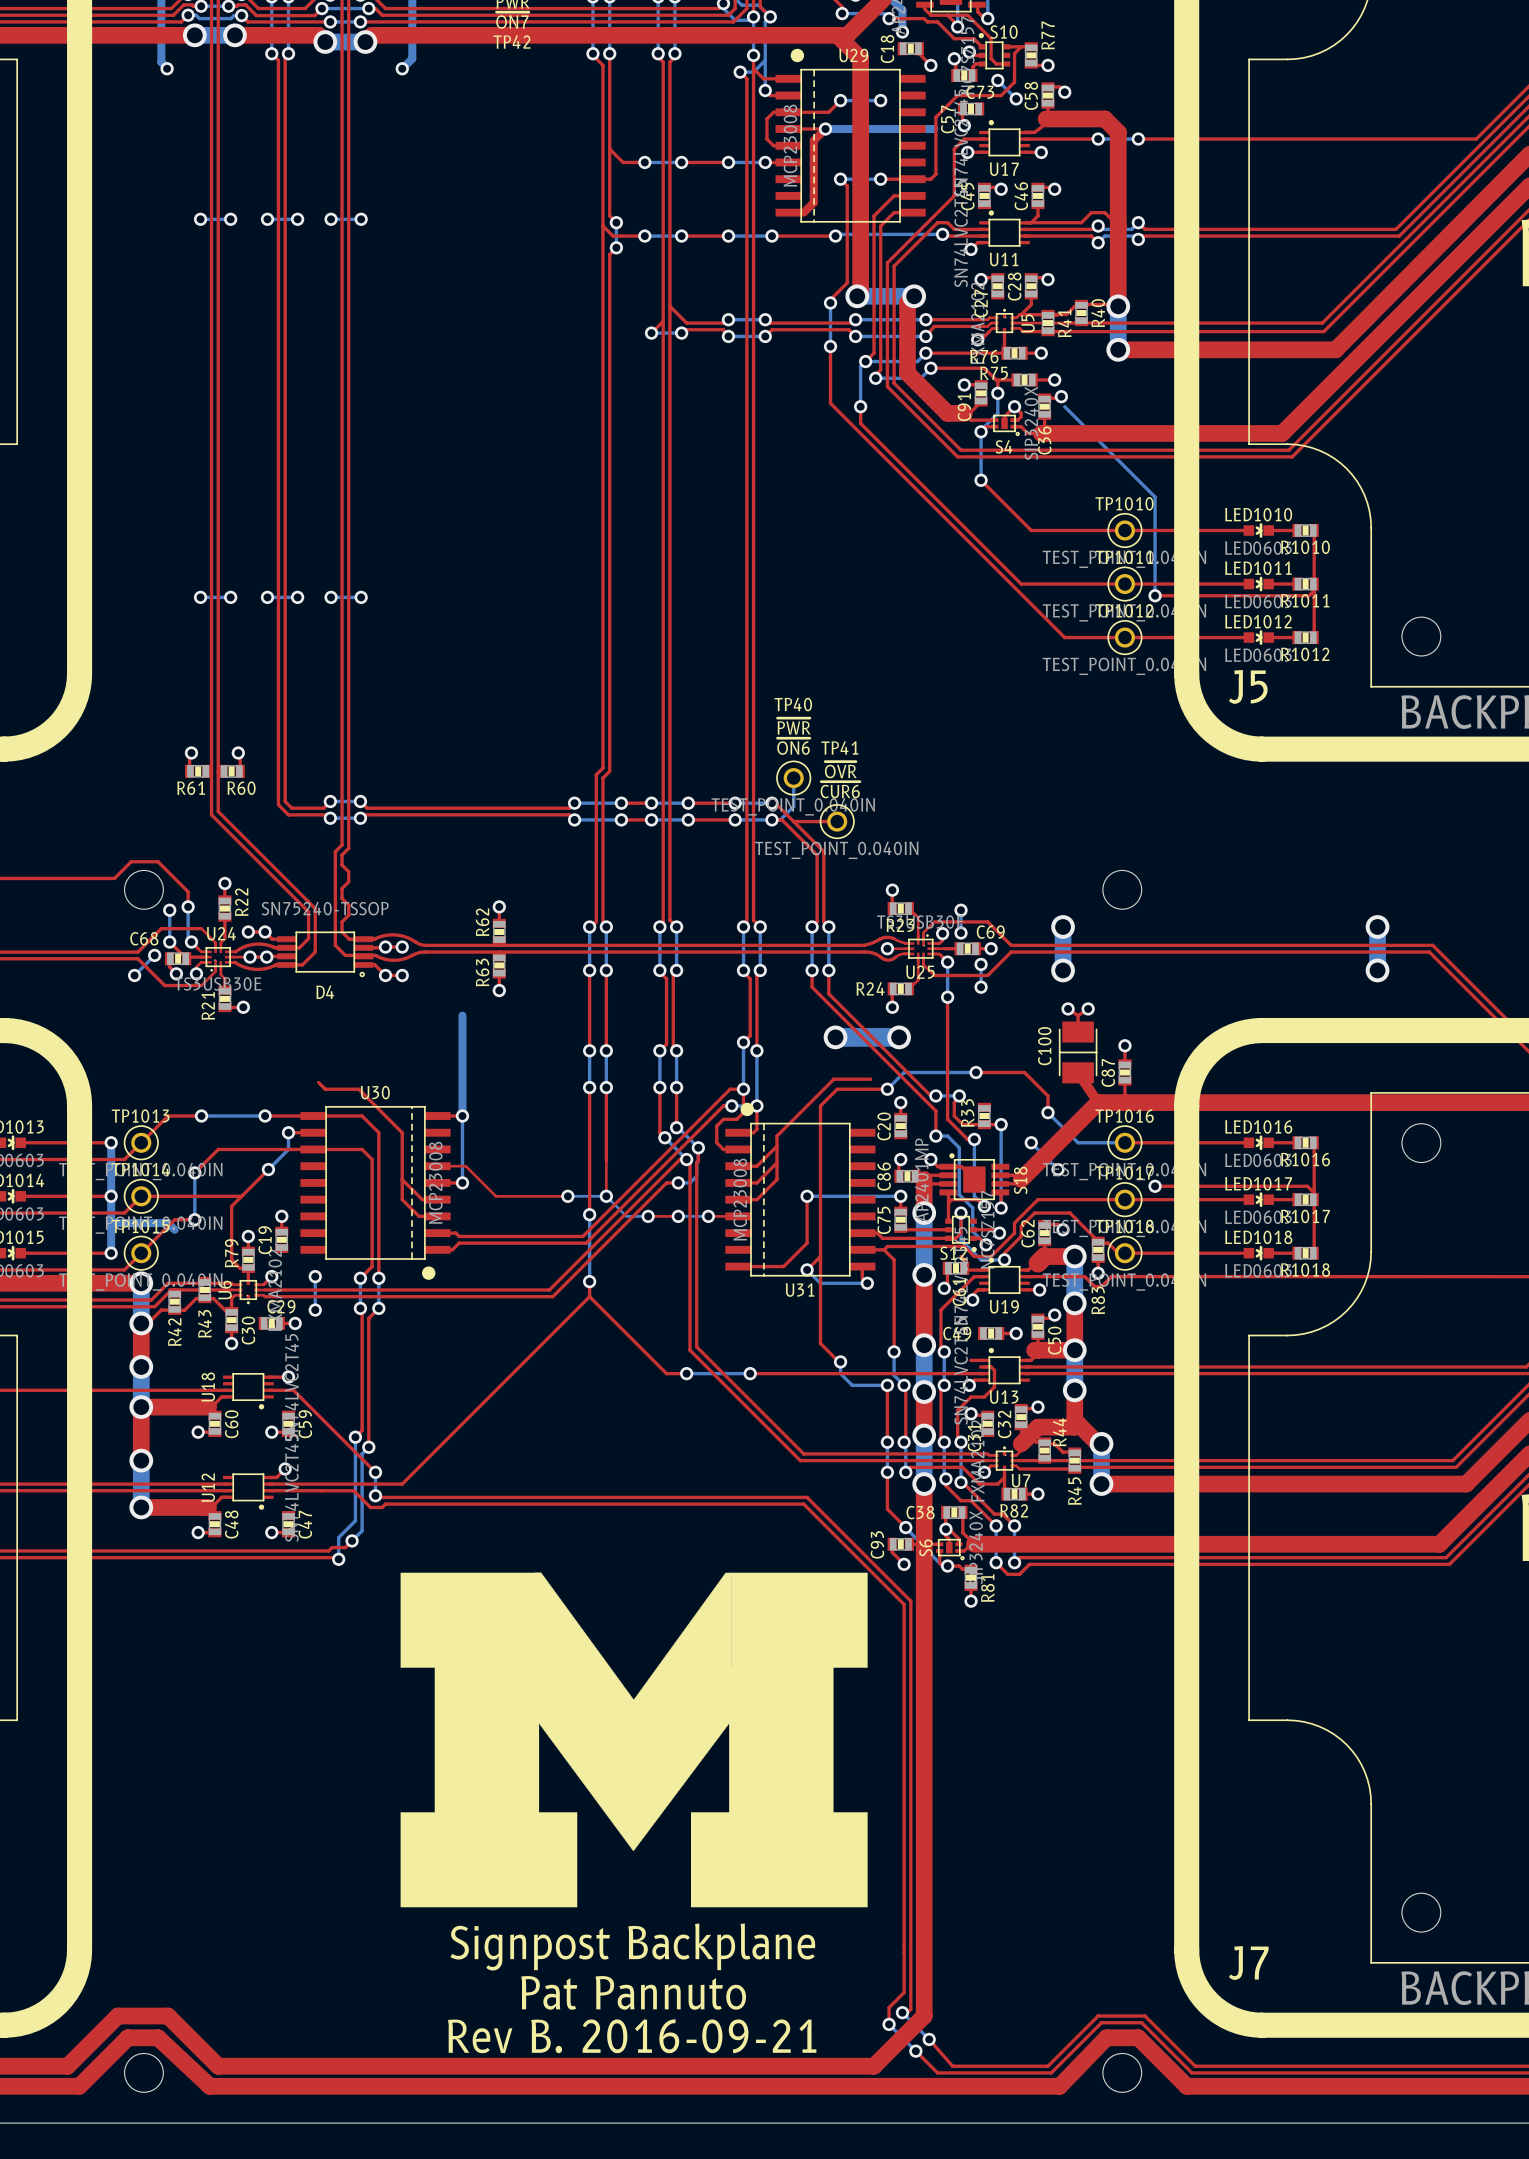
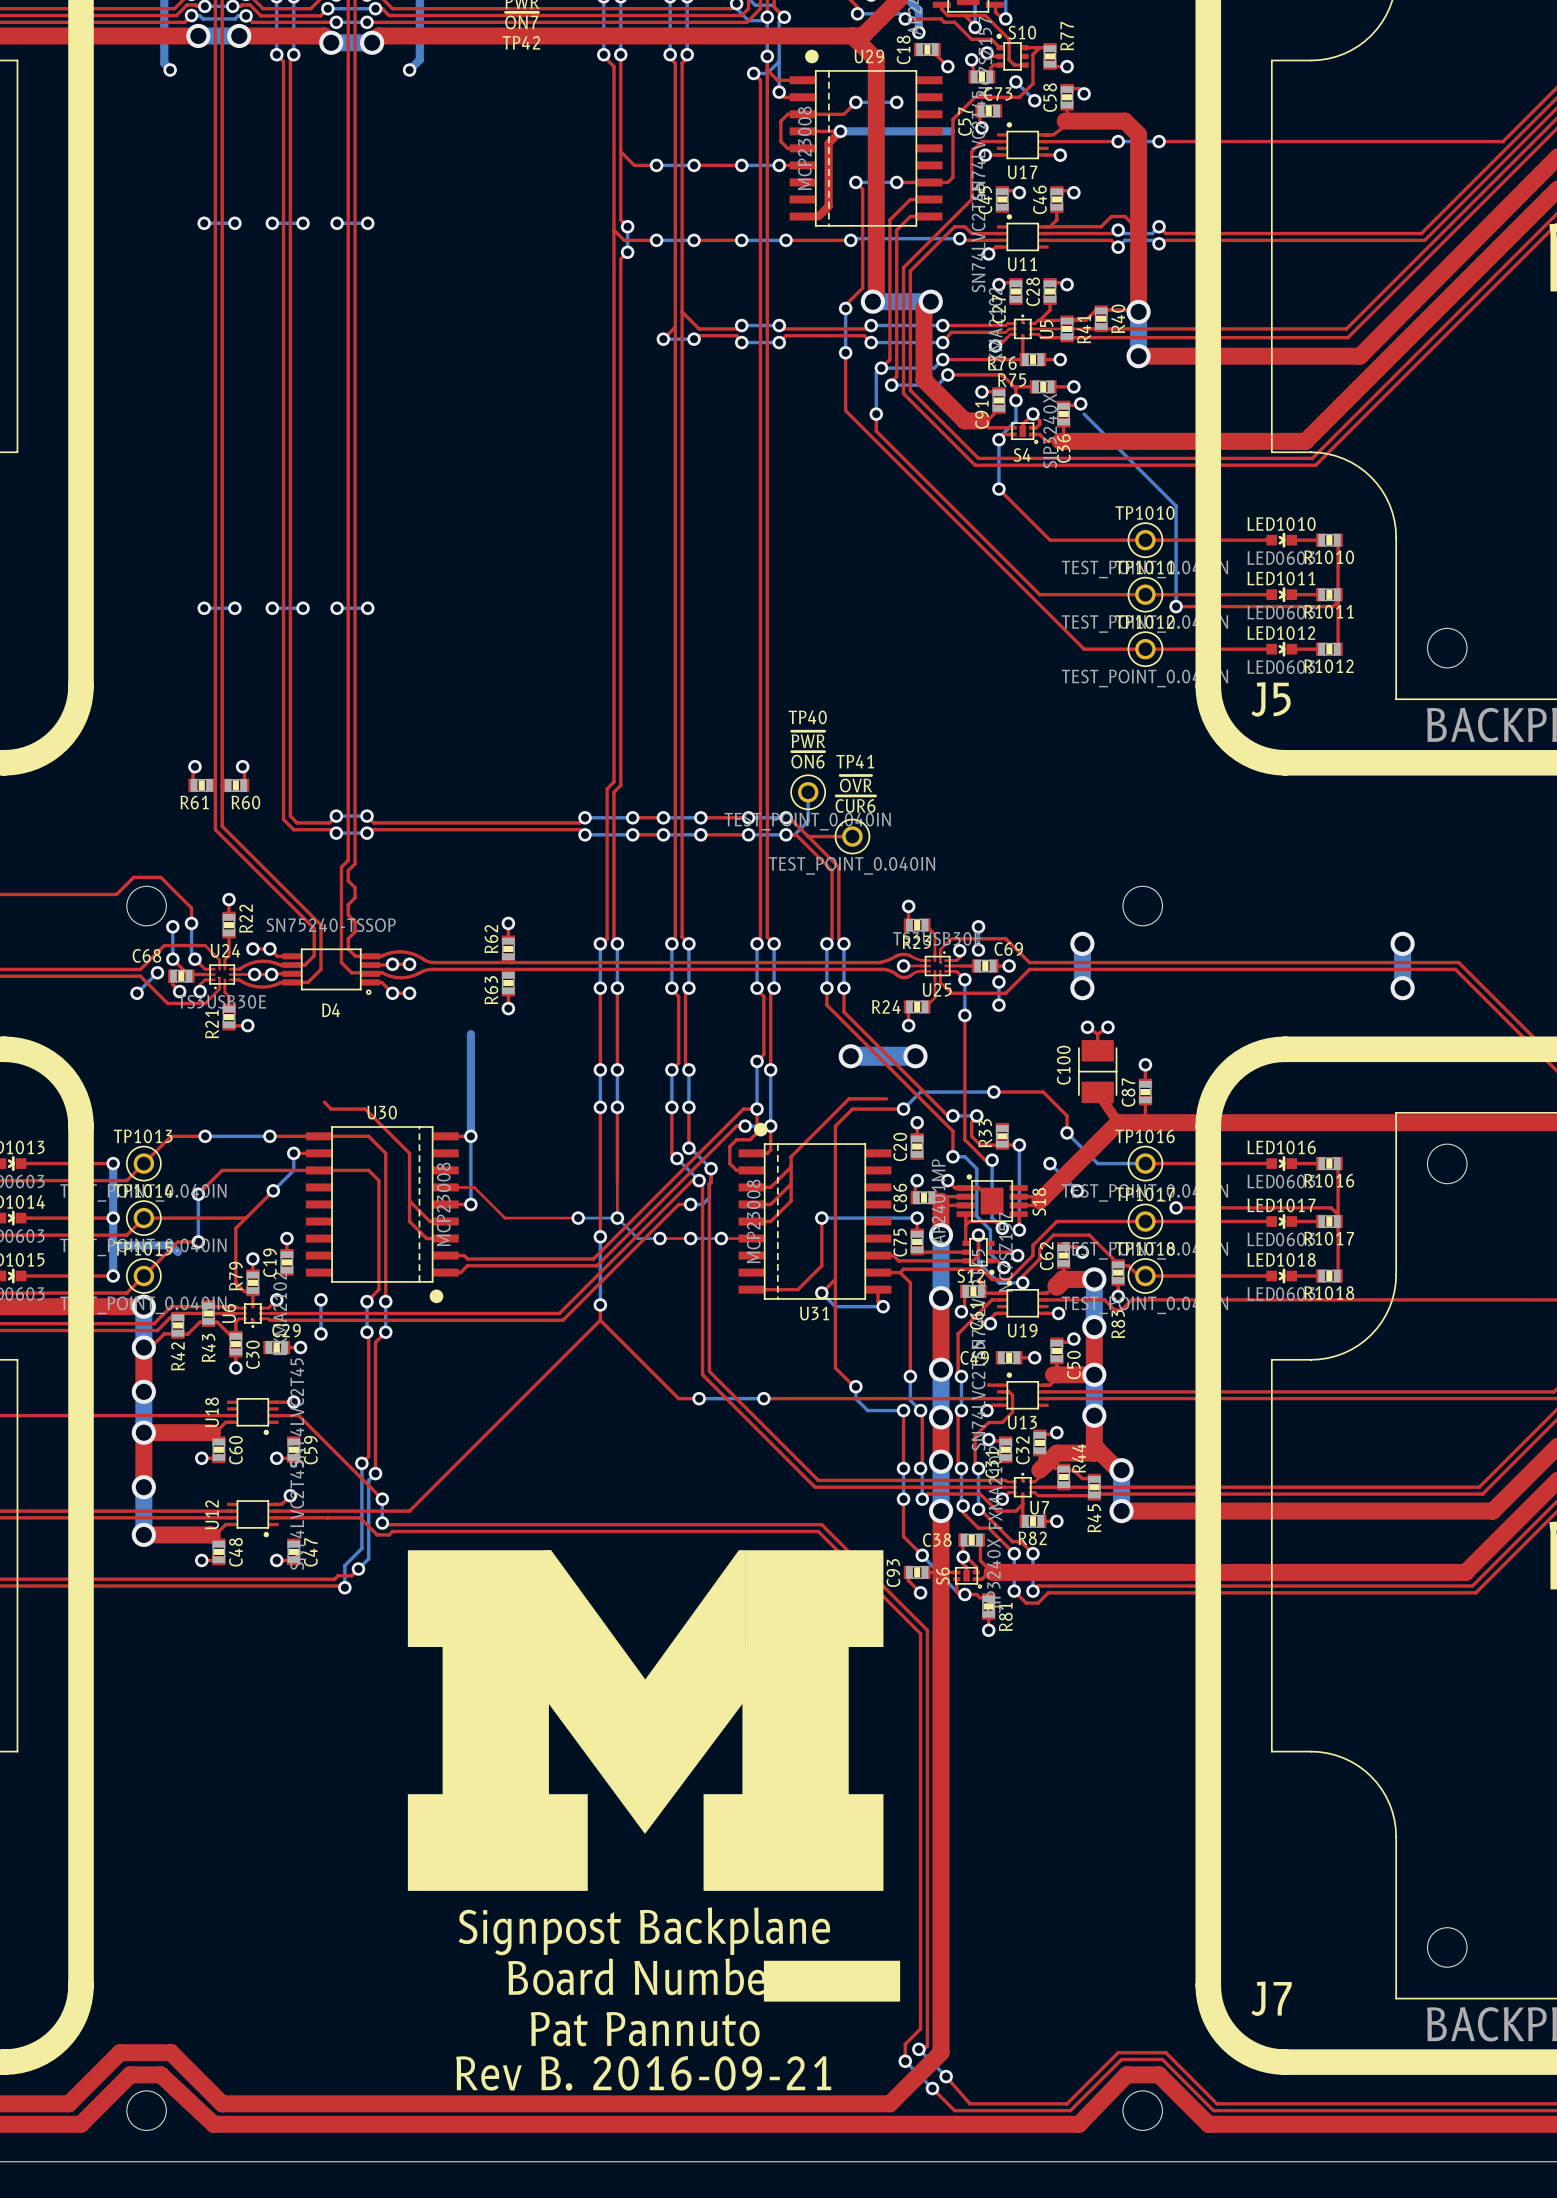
drawing position: (634, 1740) -> (645, 1720)
text: none -> Signpost Backplane (644, 1931)
drawing: none -> [763, 1960, 901, 2002]
text: Signpost Backplane (632, 1947) -> Board Number (646, 1976)

